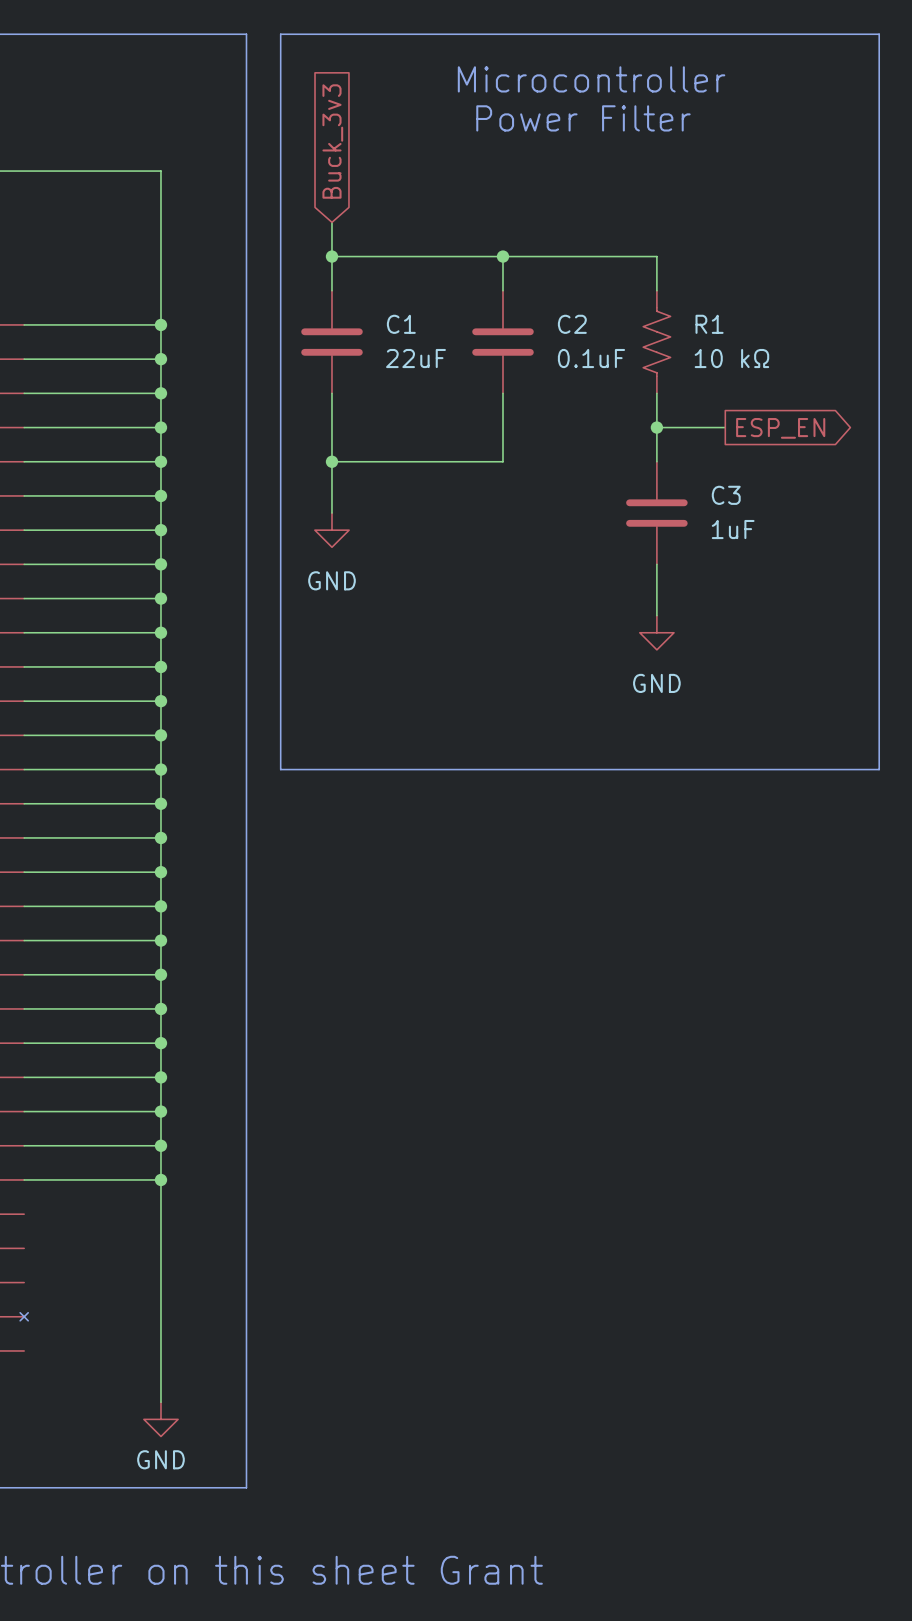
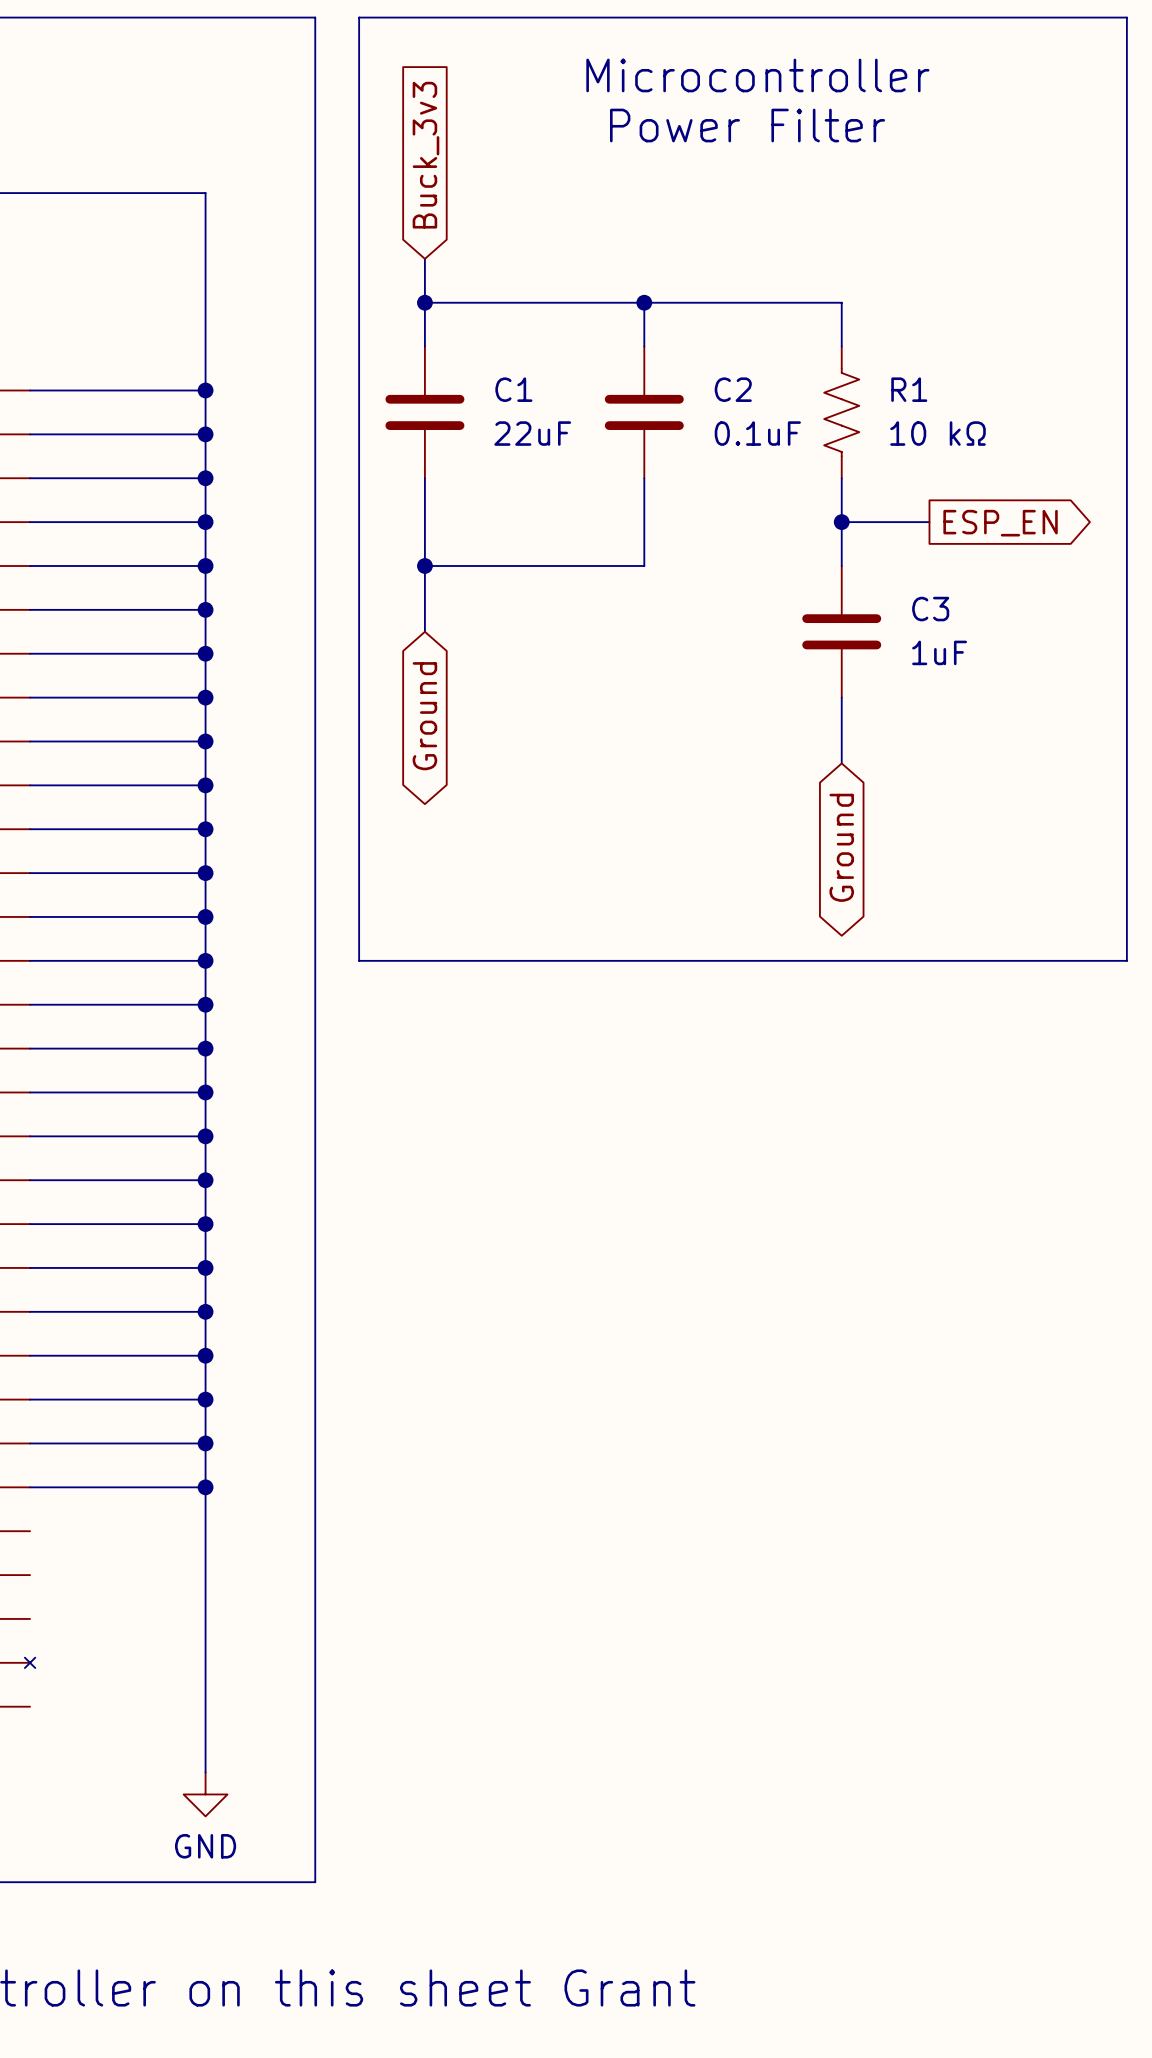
power symbol: GND (331, 530) -> none
global label: none -> Ground (424, 716)
power symbol: GND (656, 632) -> none
global label: none -> Ground (841, 847)

